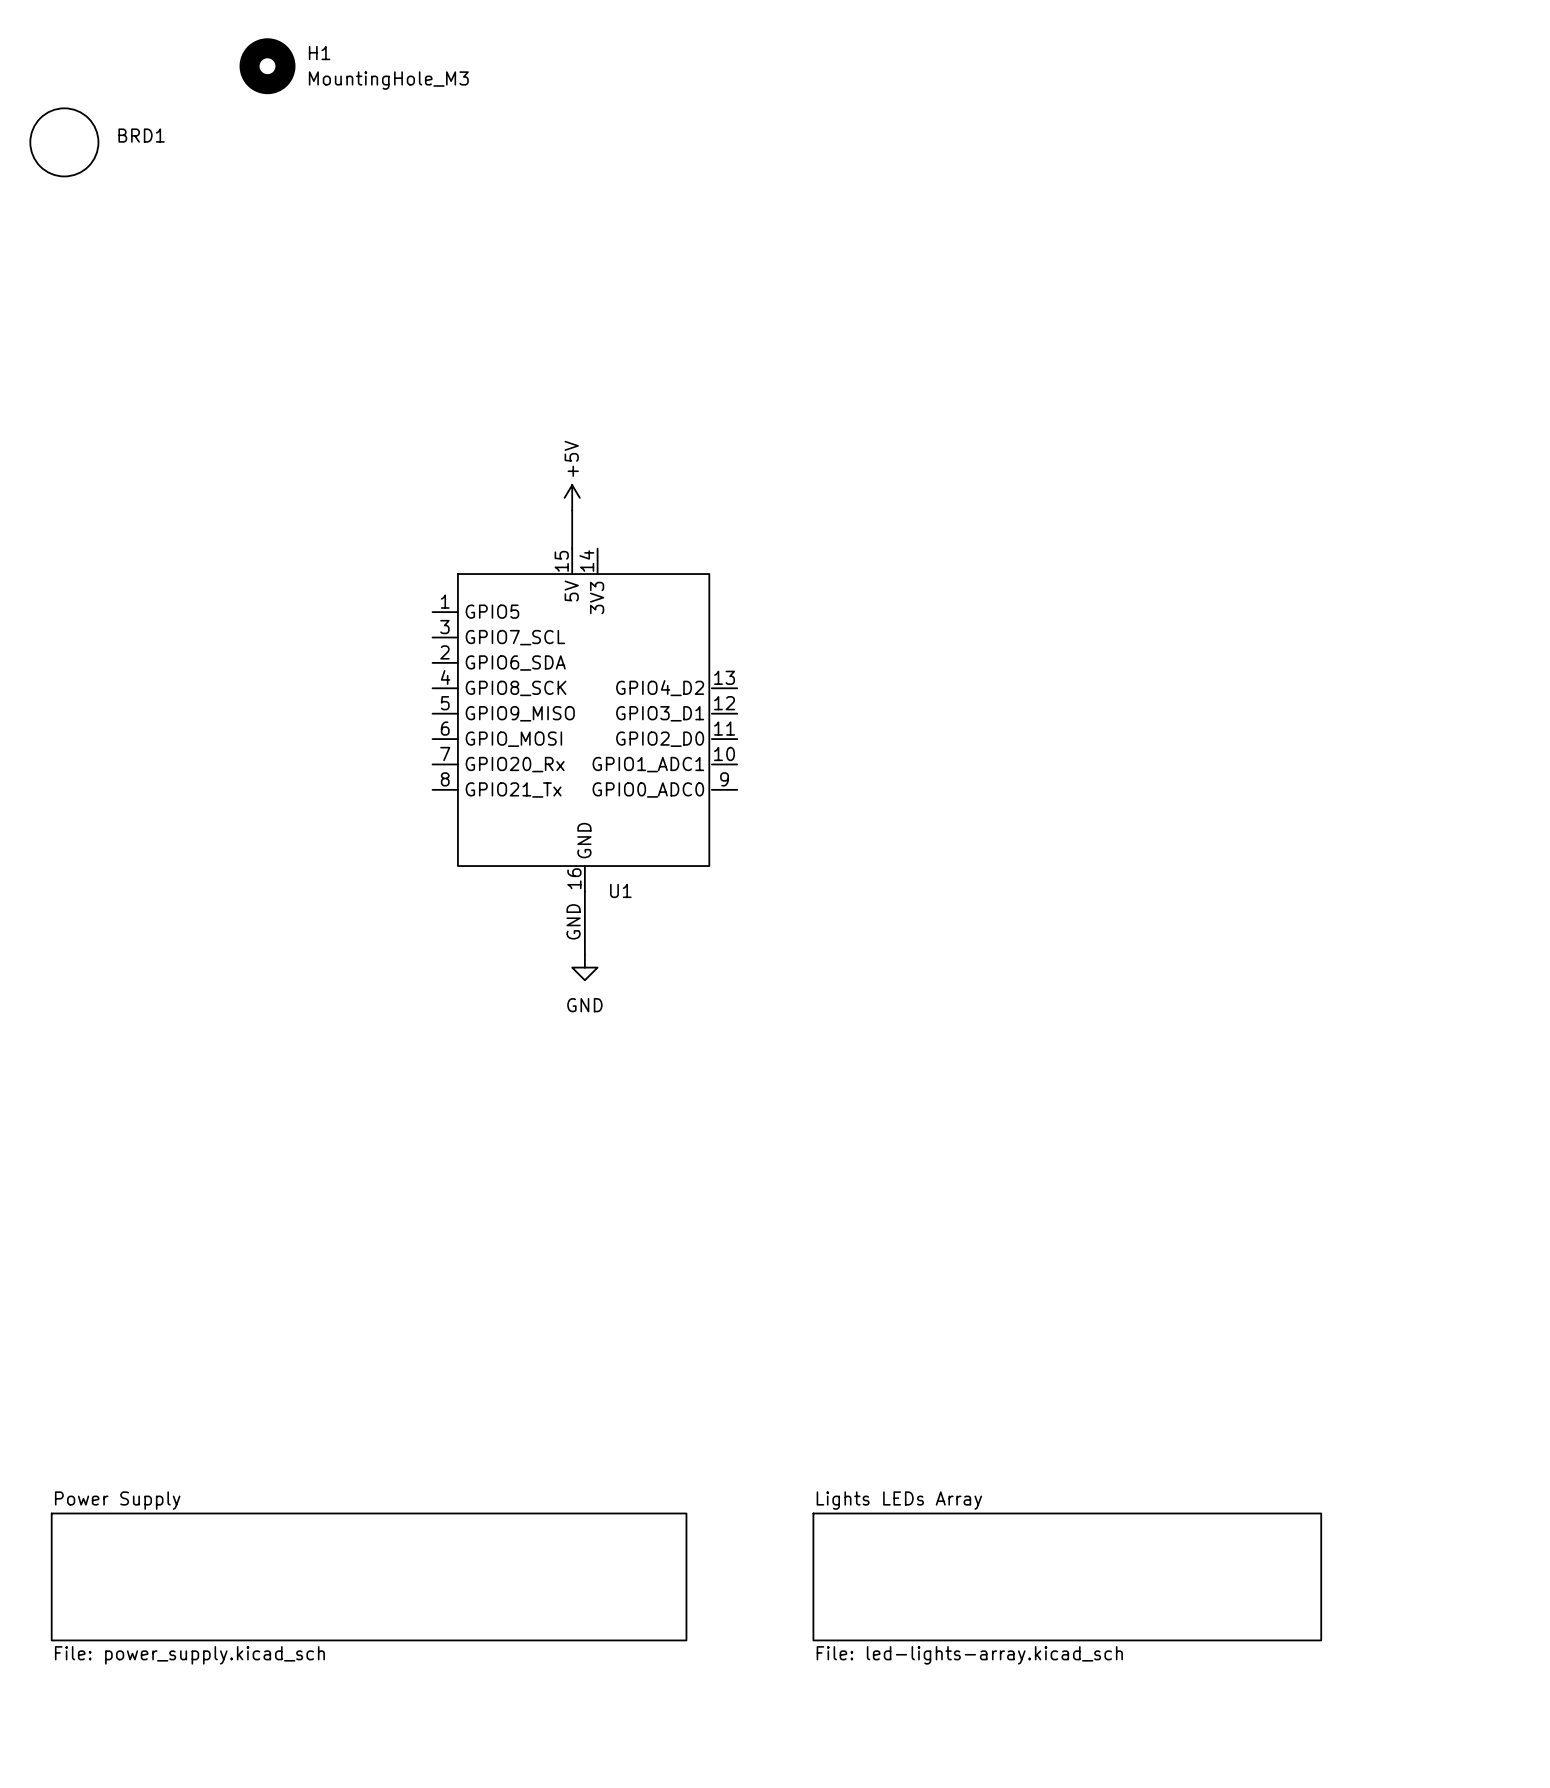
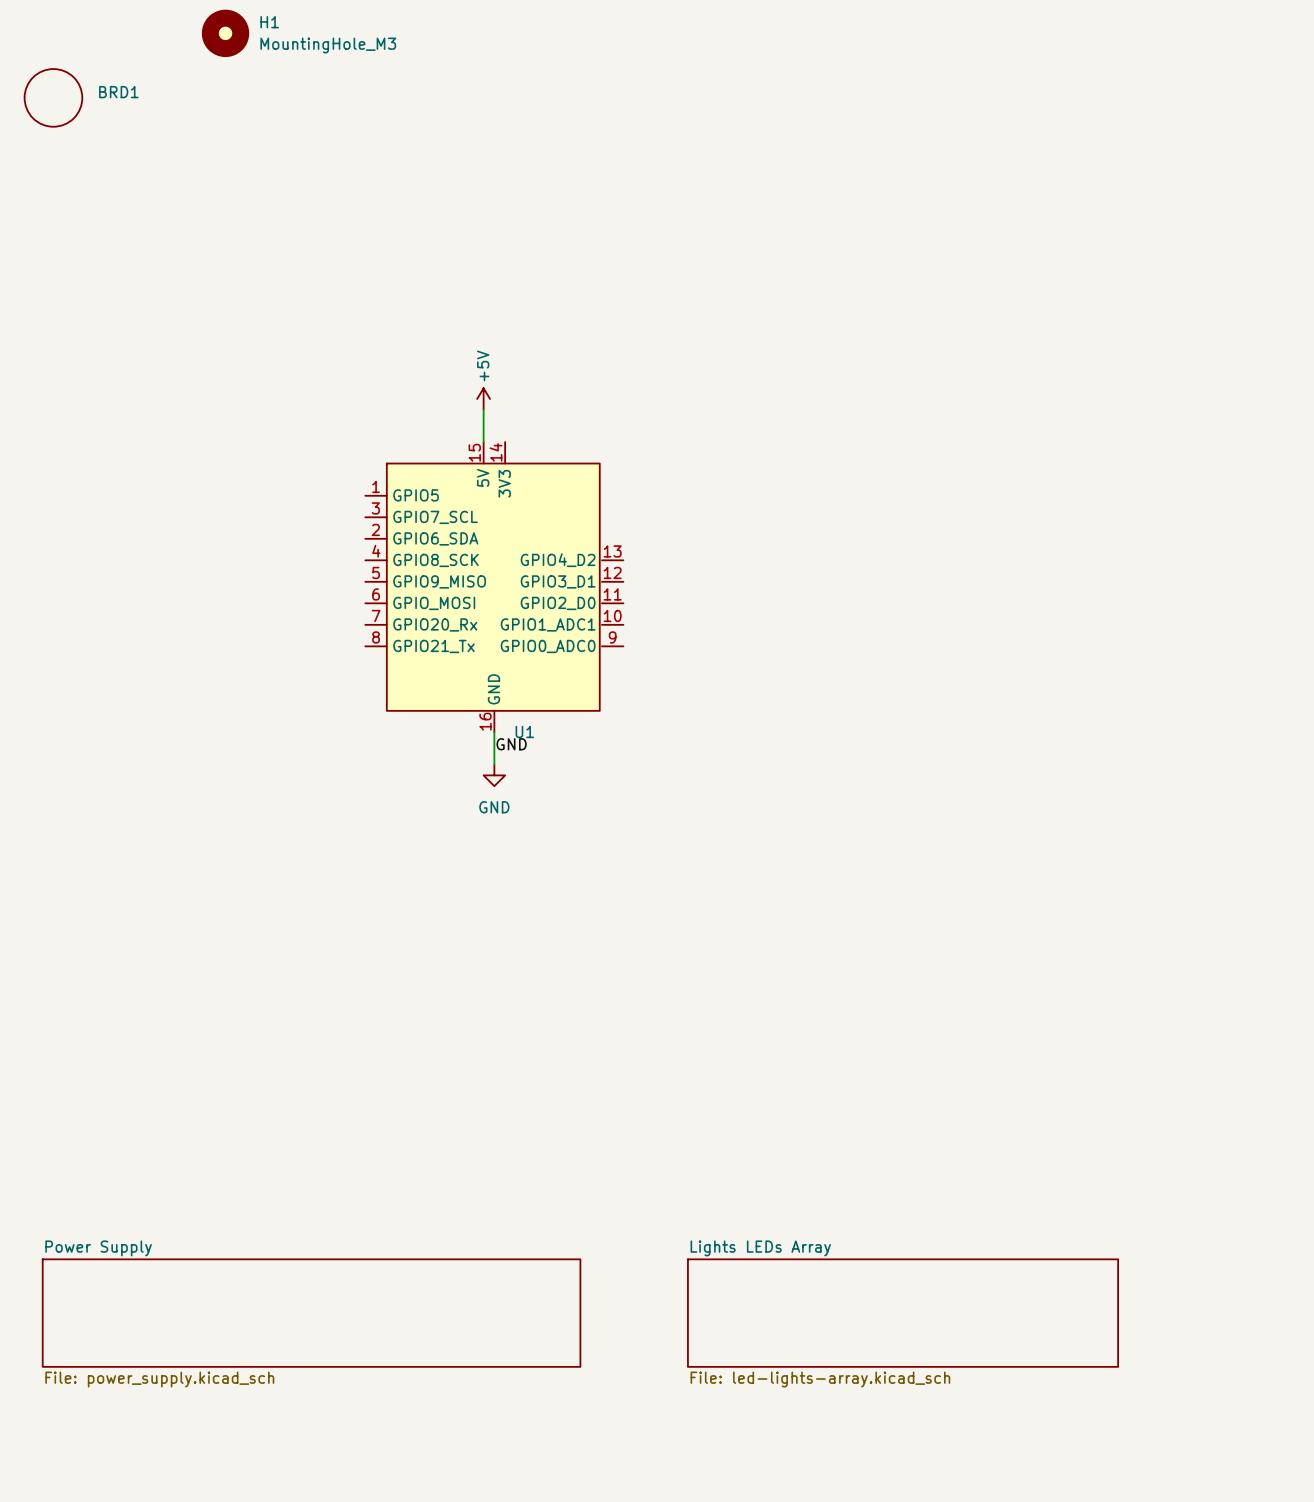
label rotation: 0° (573, 921) -> 90° clockwise (511, 744)
power symbol position: GND (584, 967) -> GND (494, 775)

